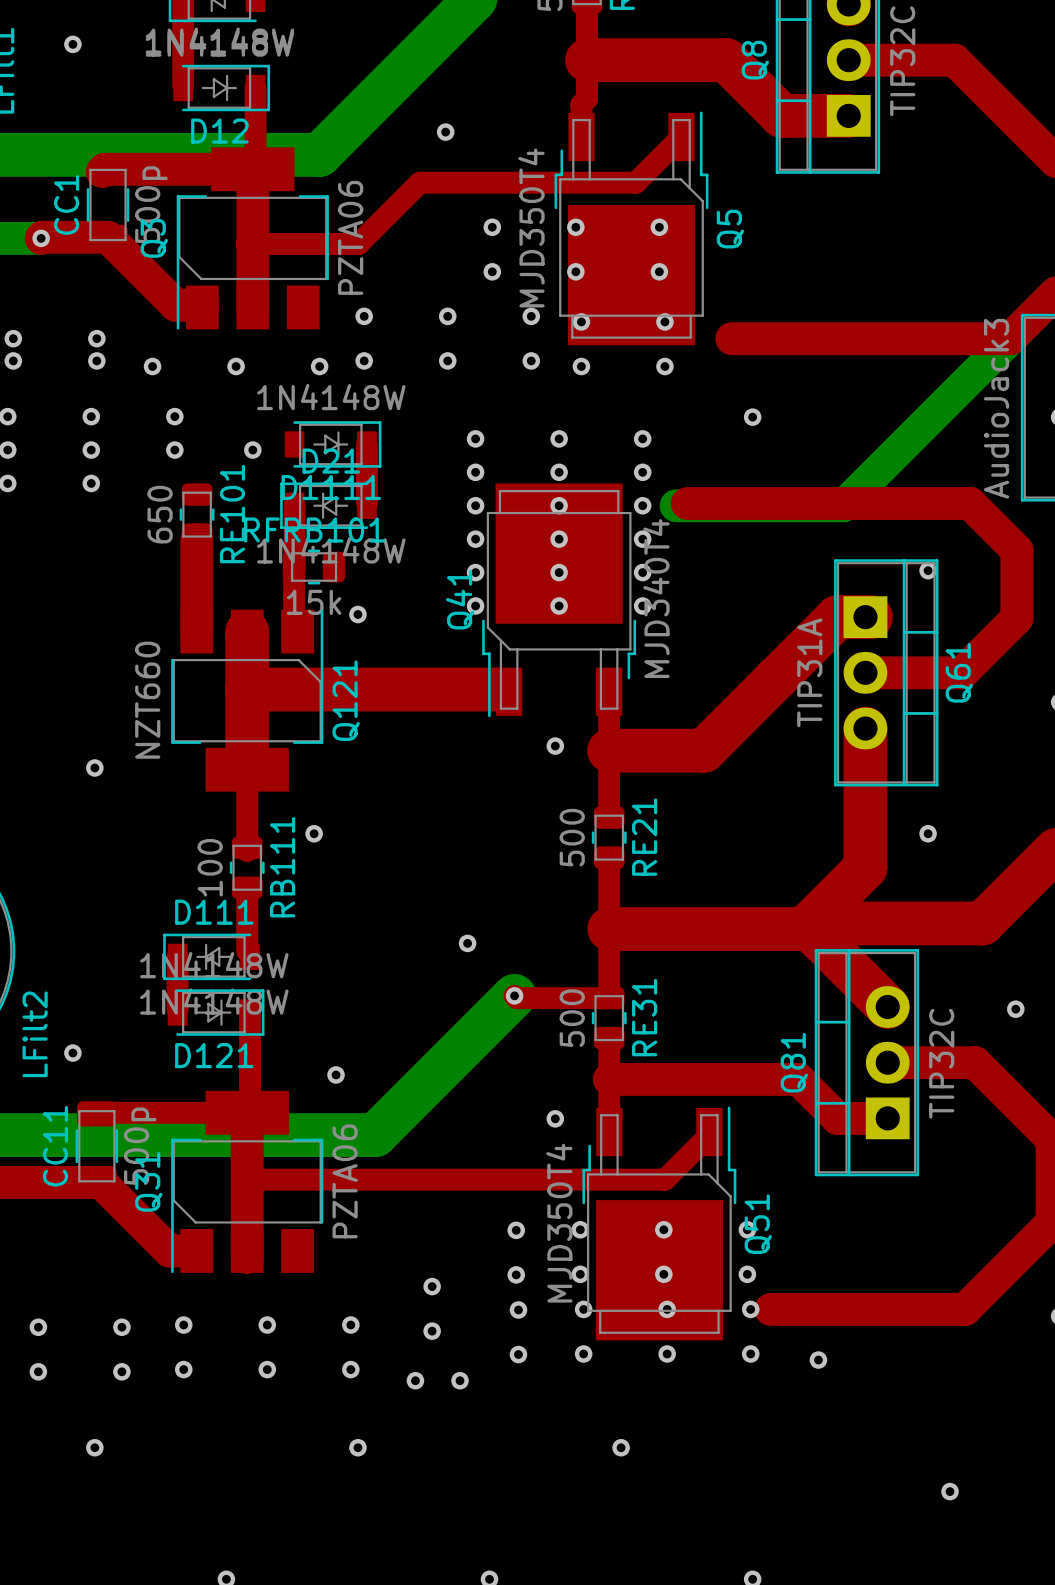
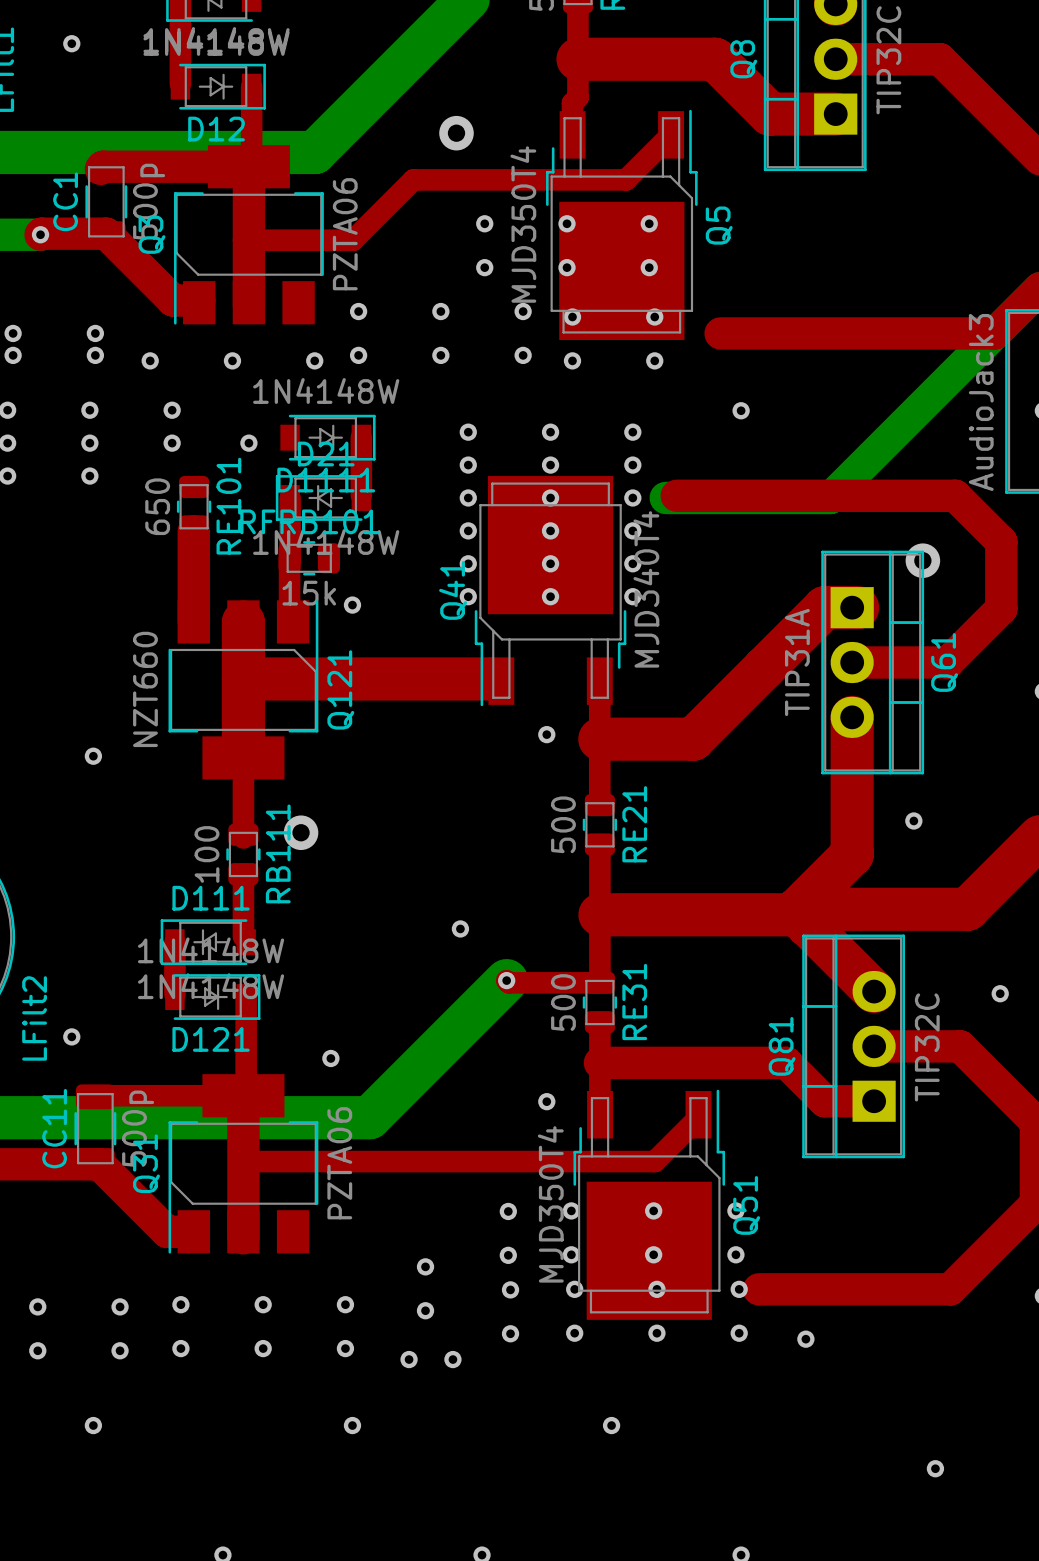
via size: [436, 123, 455, 141] -> [439, 115, 474, 151]
via size: [919, 561, 937, 580] -> [905, 543, 941, 578]
via size: [305, 825, 323, 843] -> [283, 815, 319, 851]

